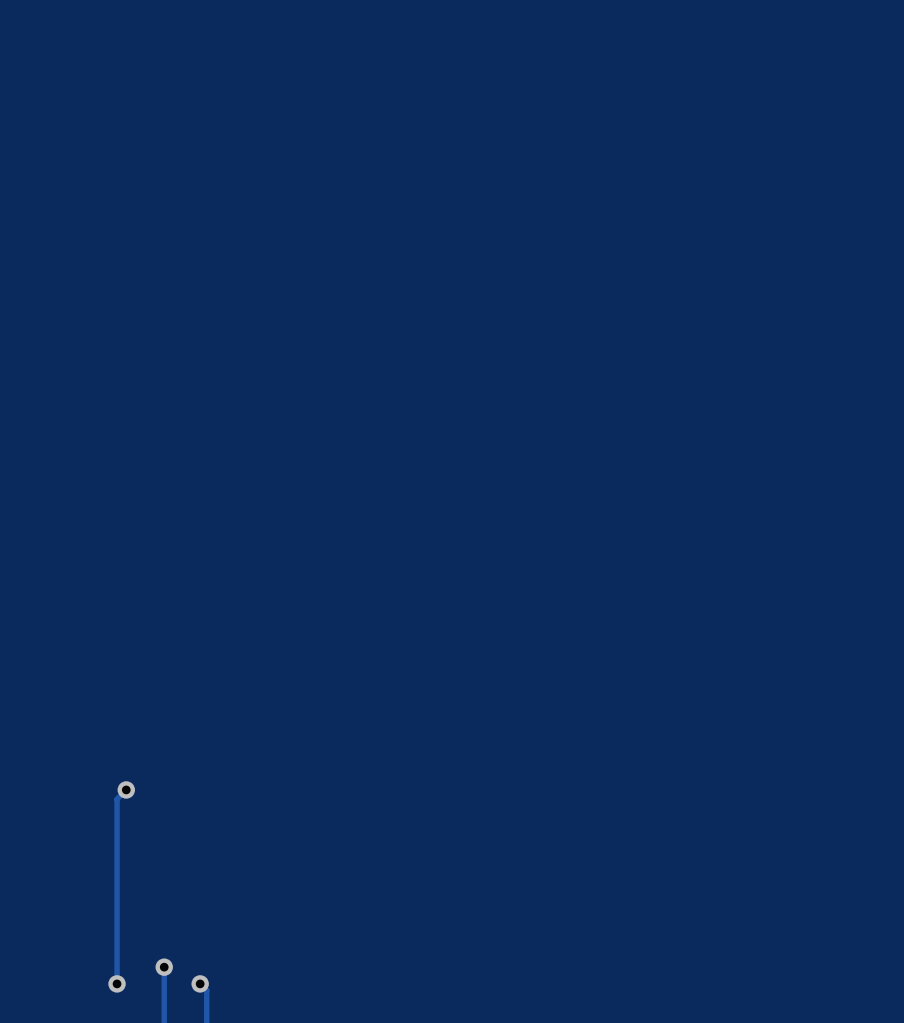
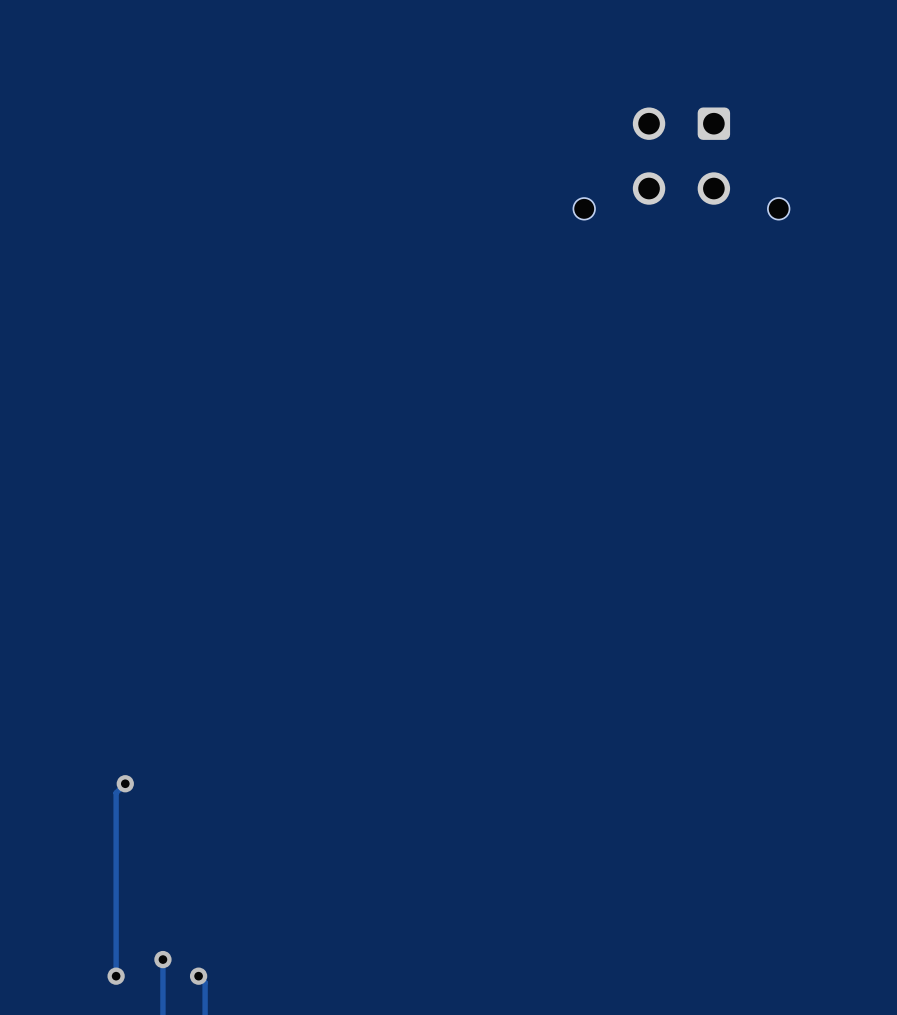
part: none -> (681, 163)

